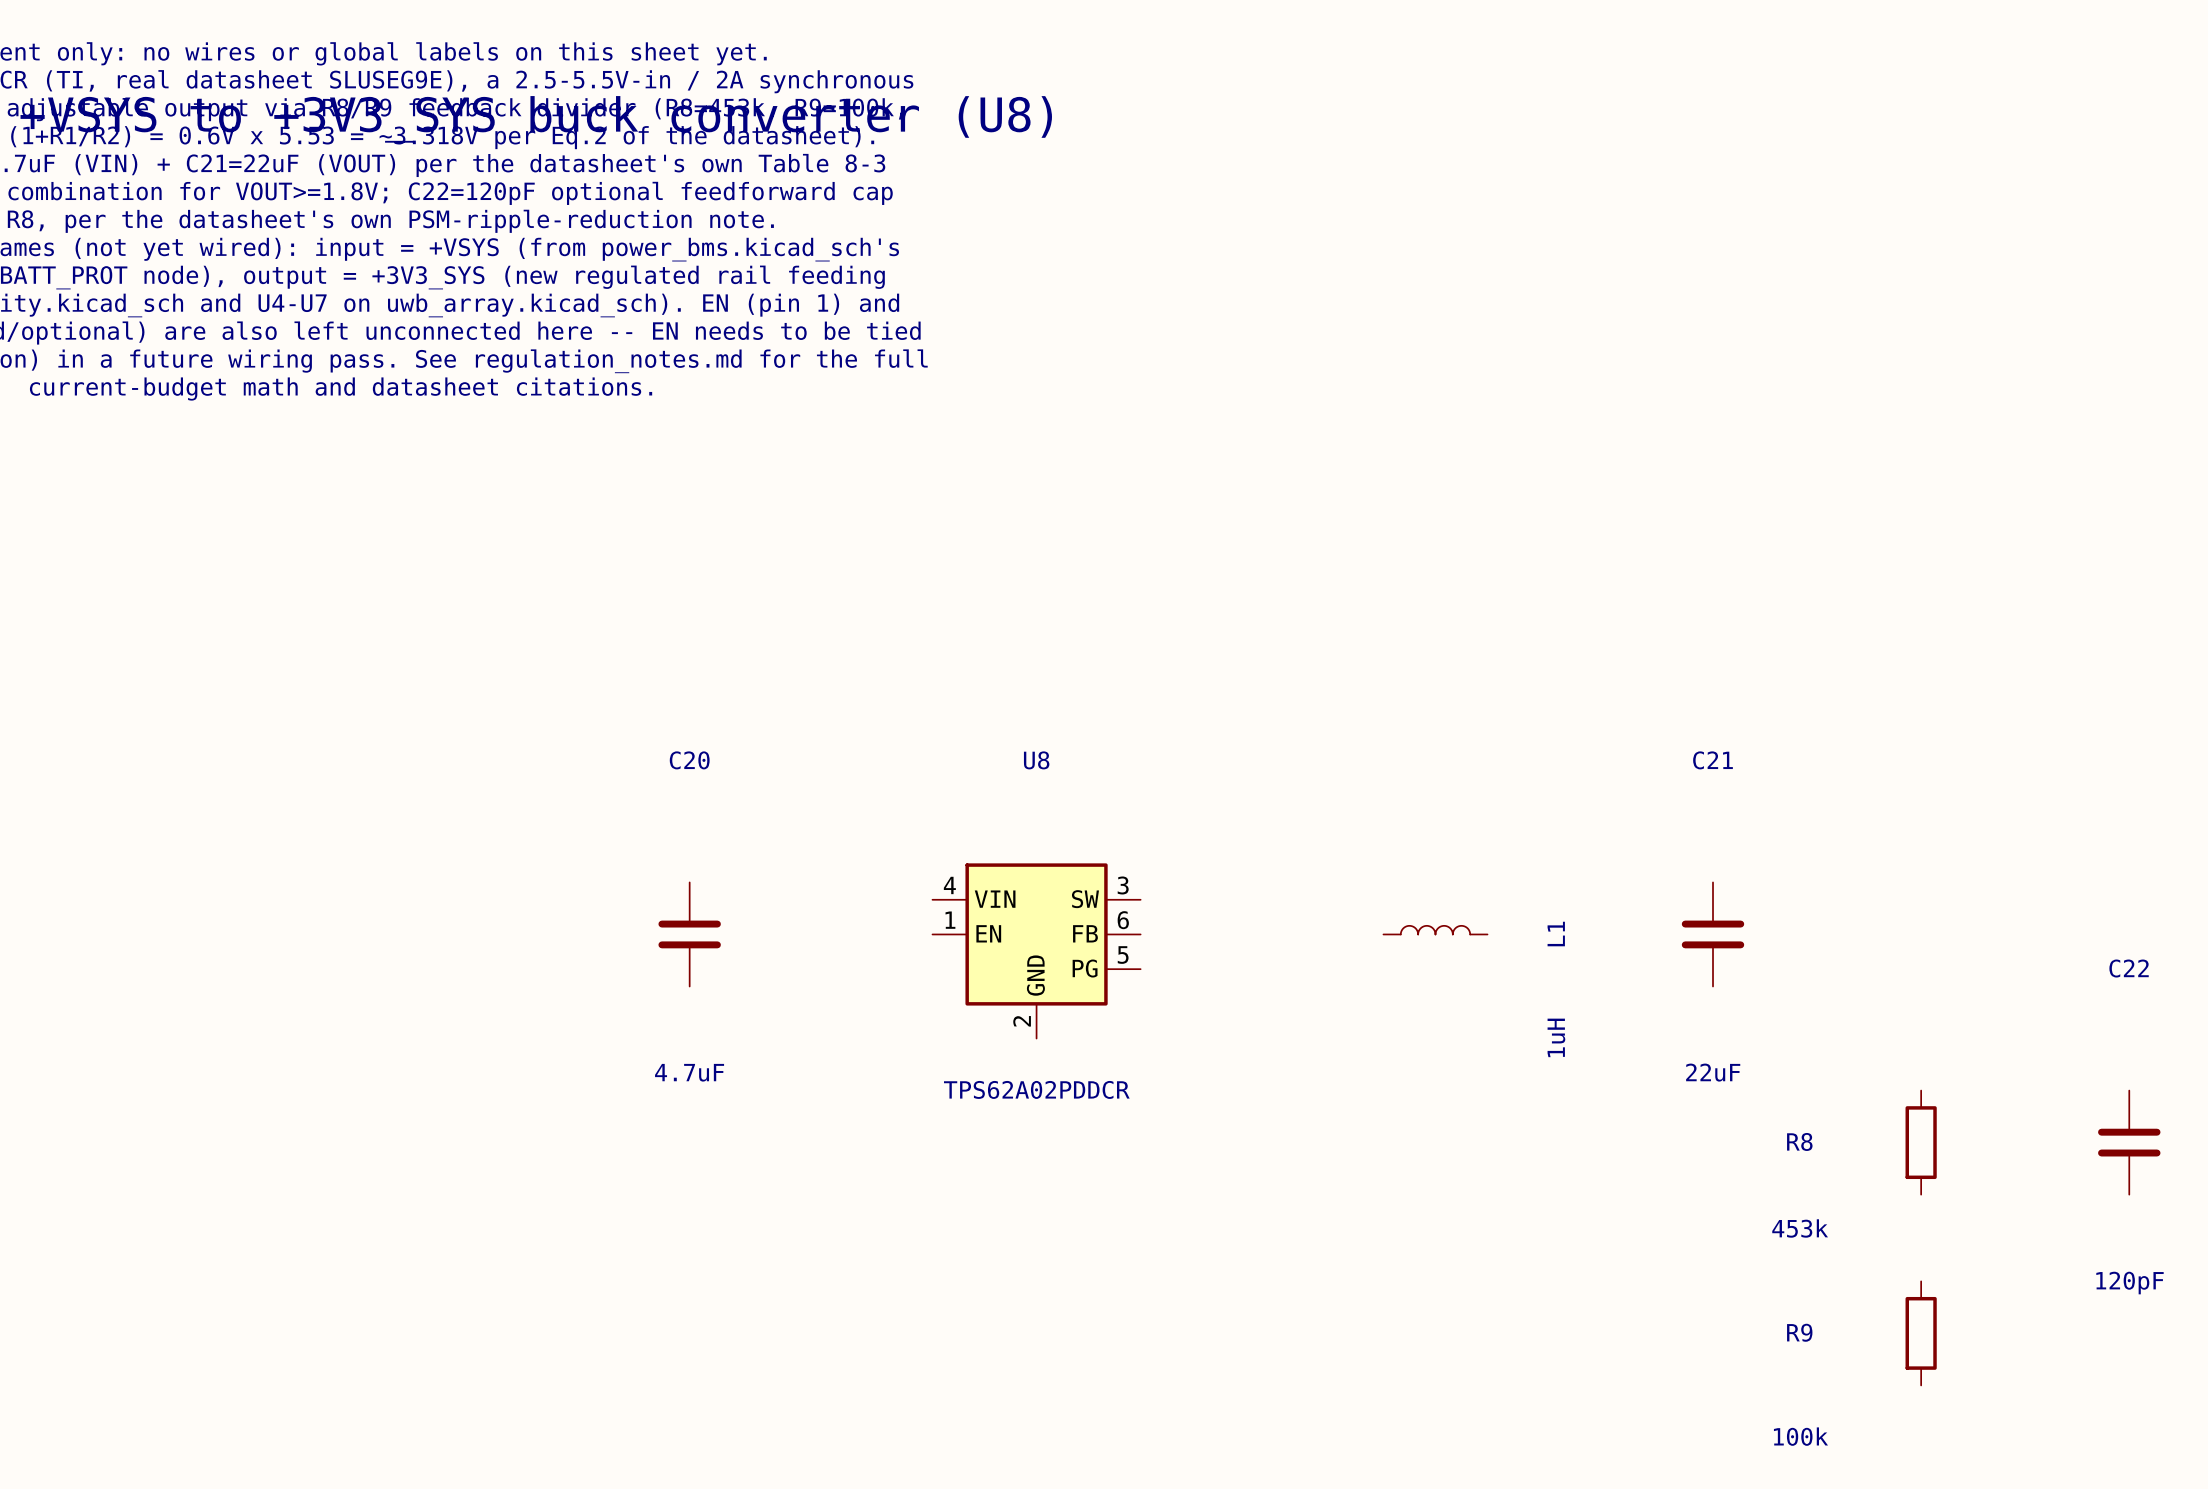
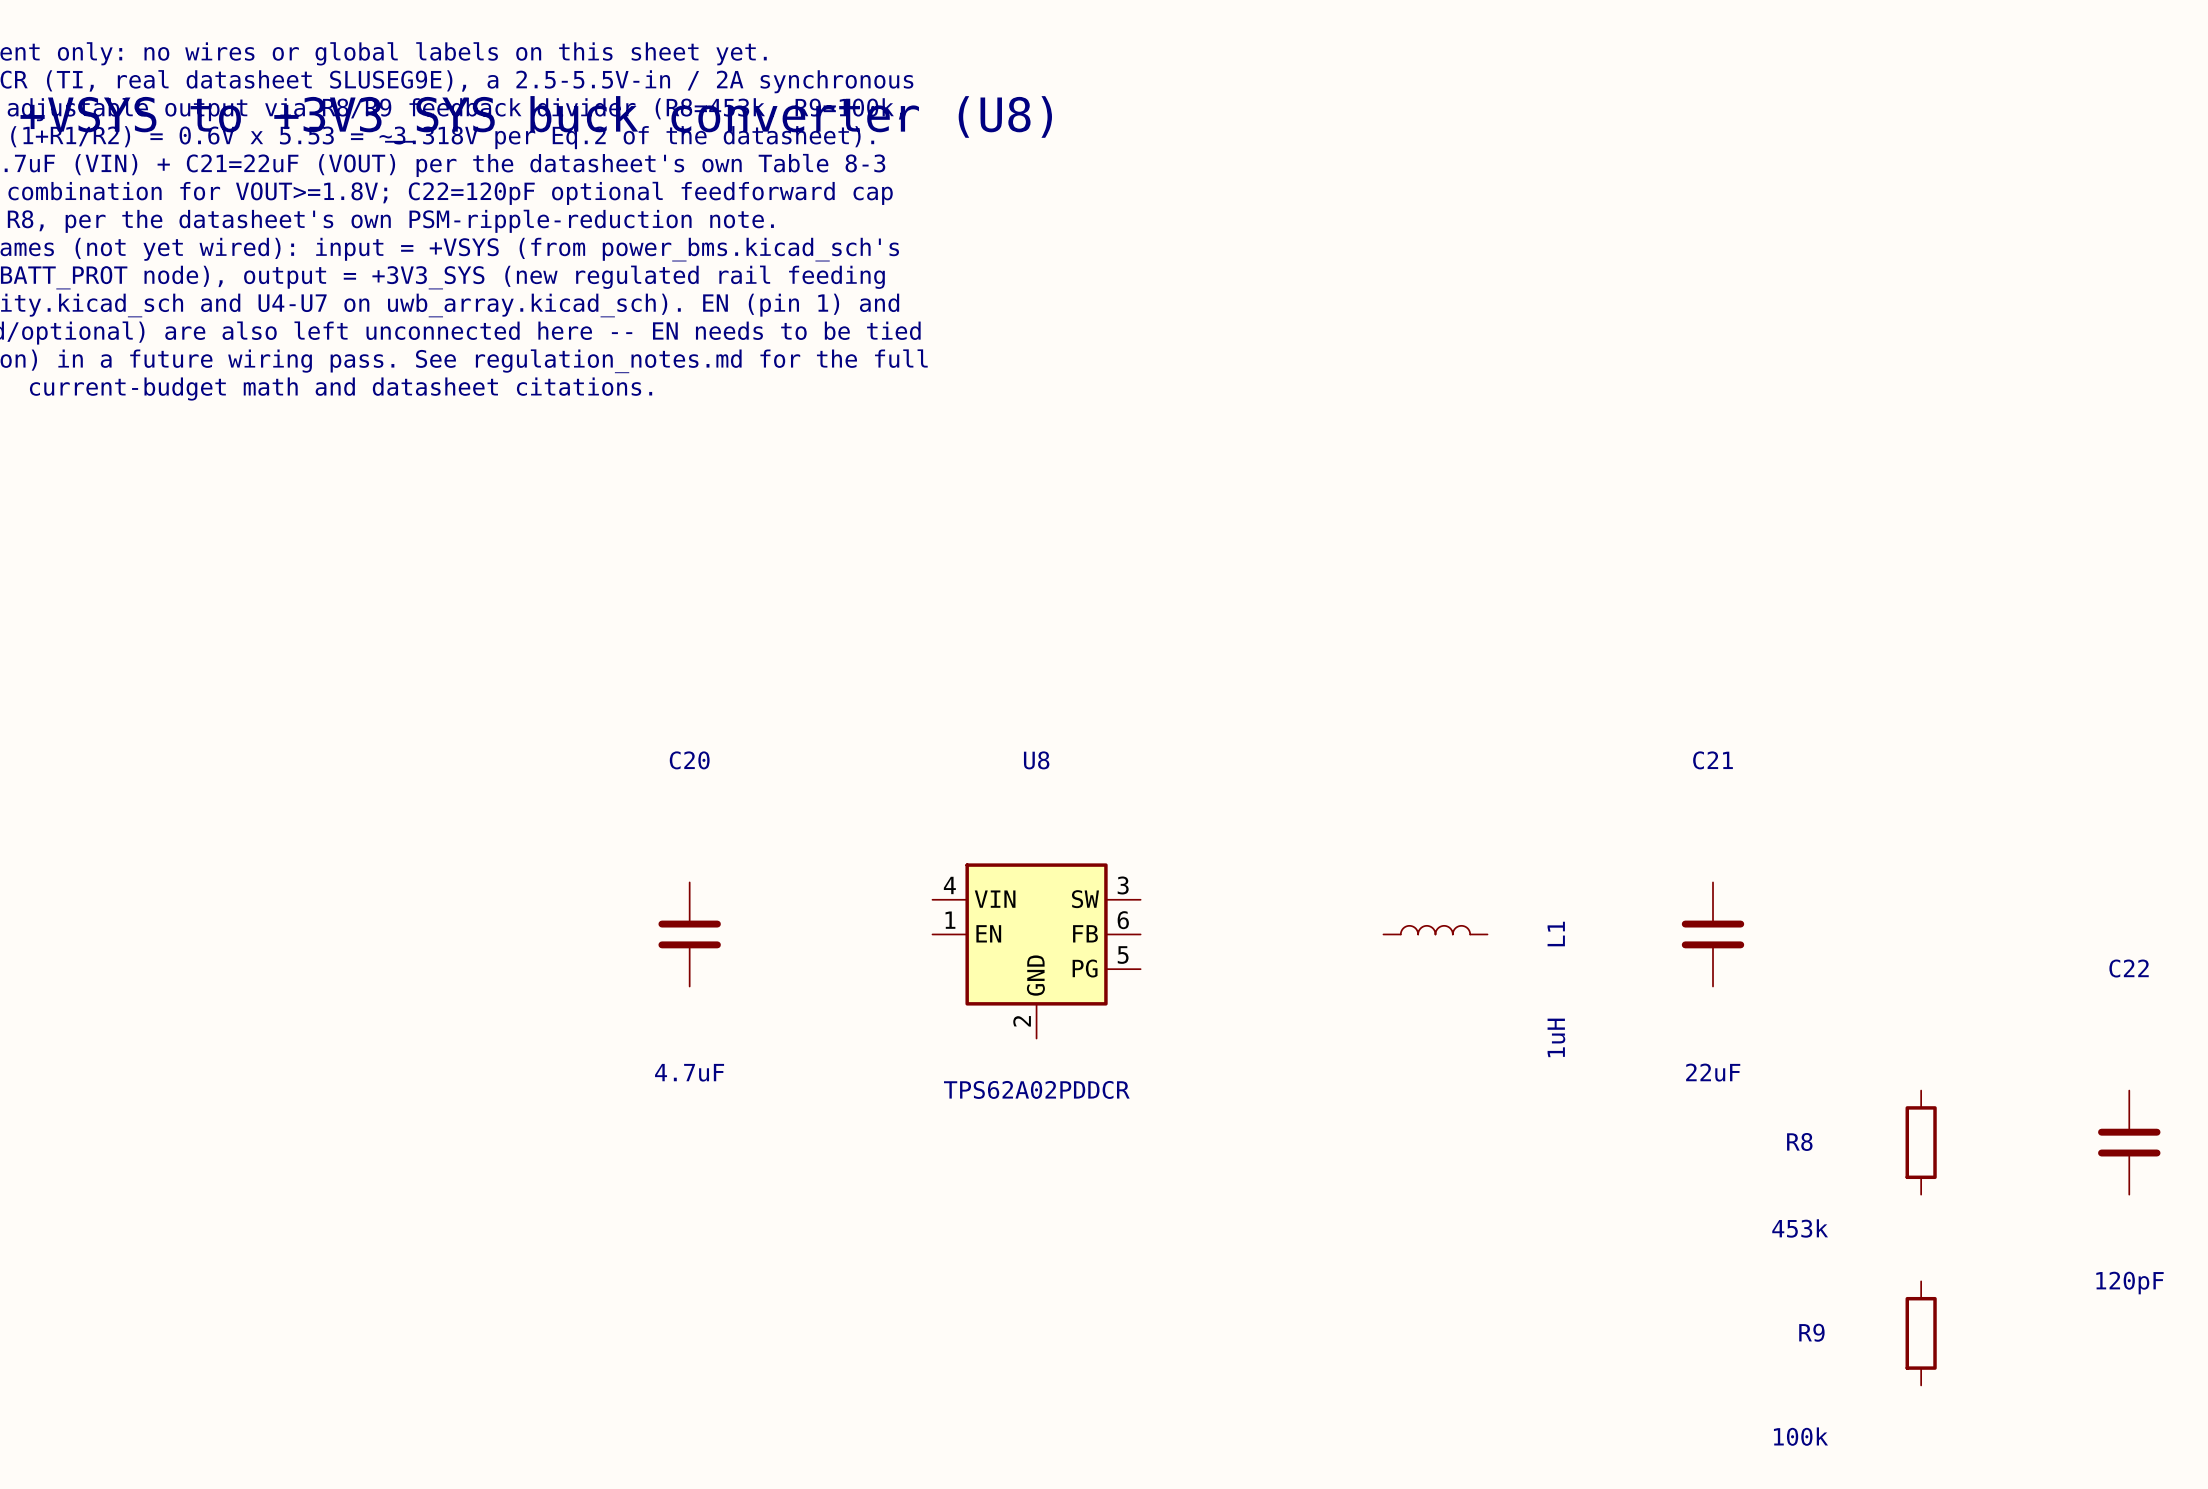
R9 name position: R9 (1799, 1332) -> R9 (1811, 1332)

